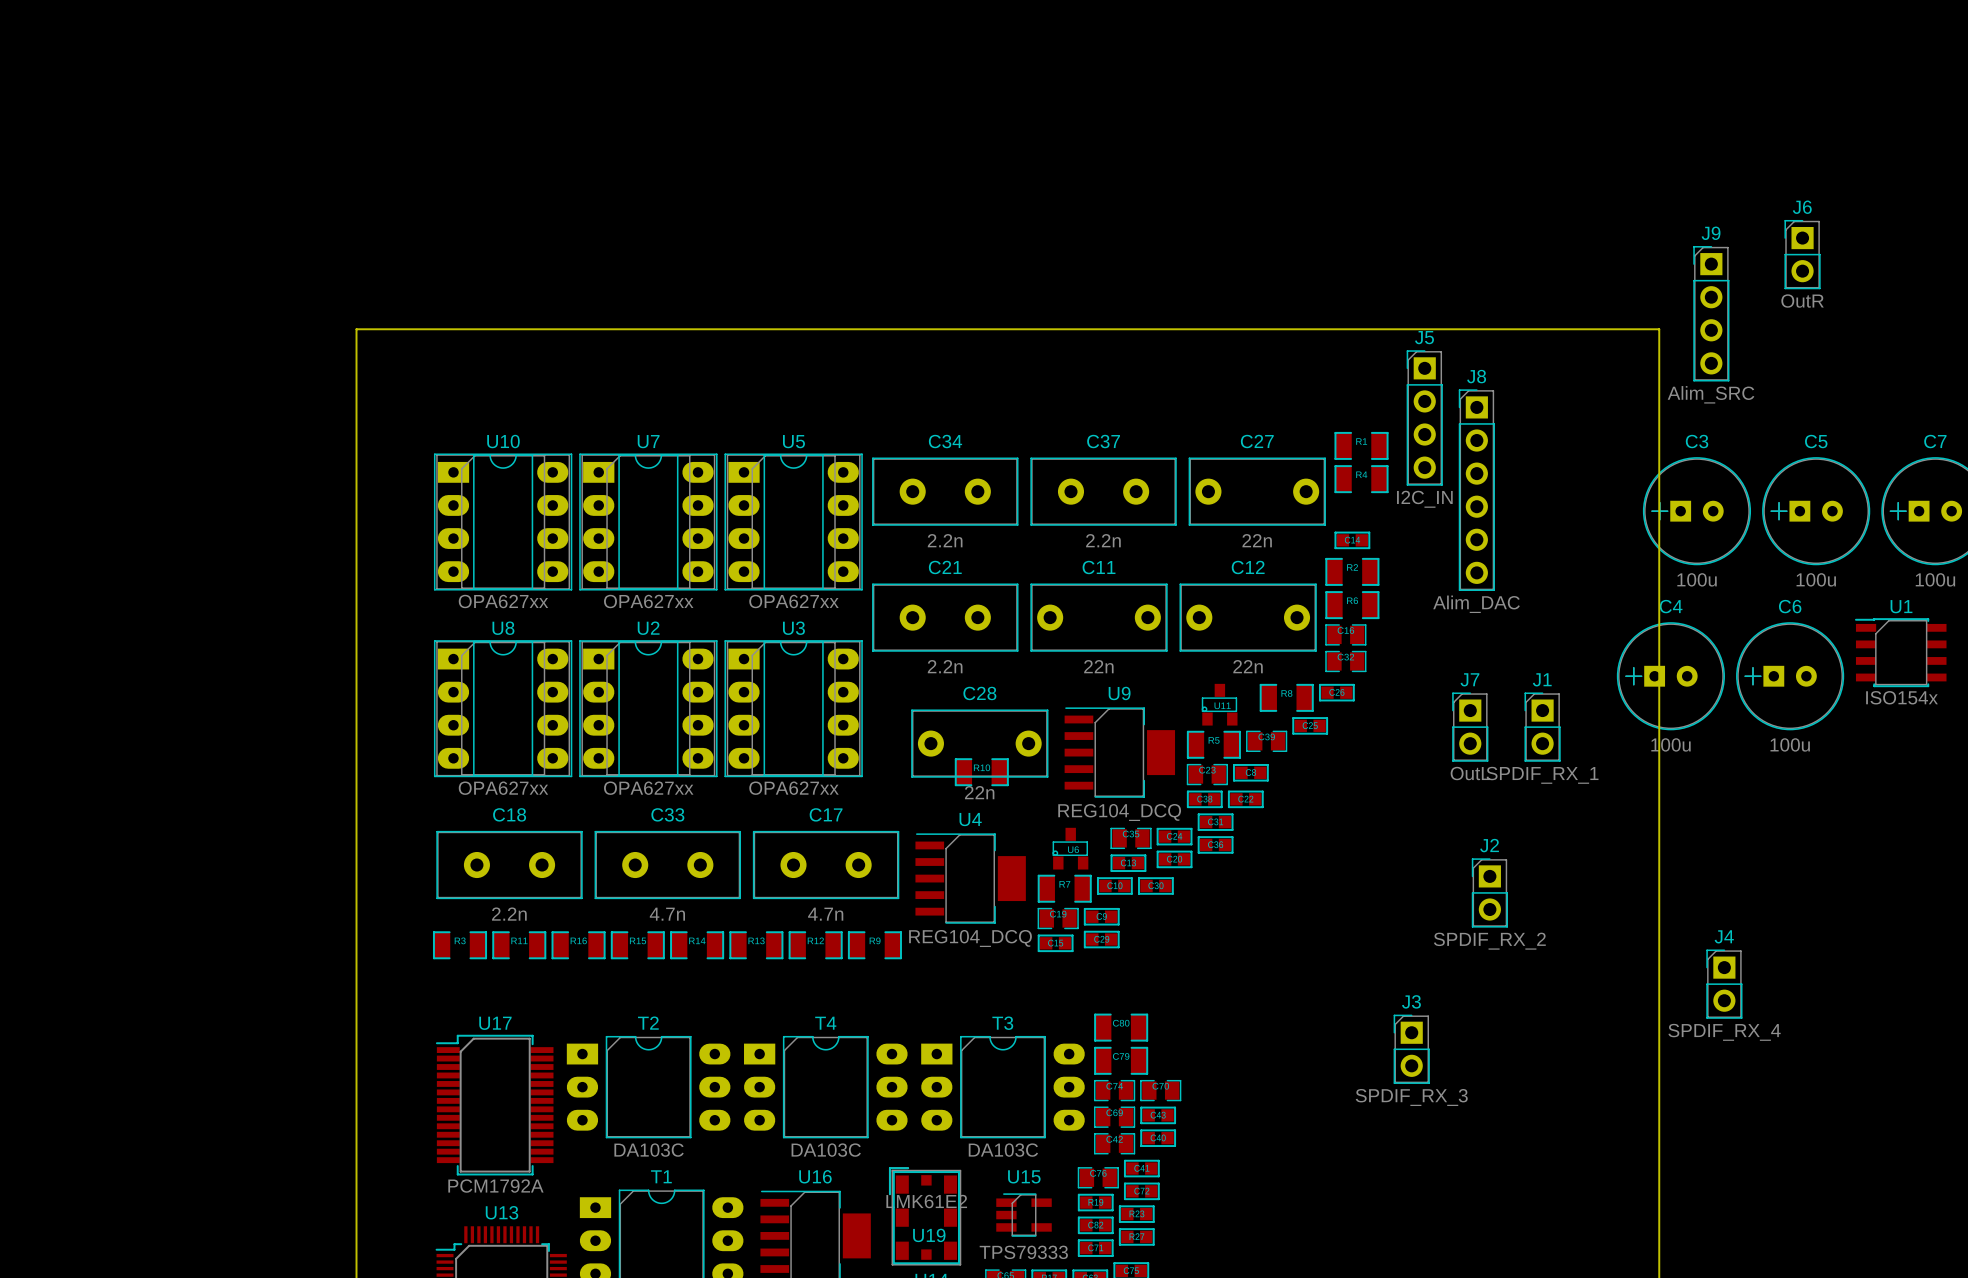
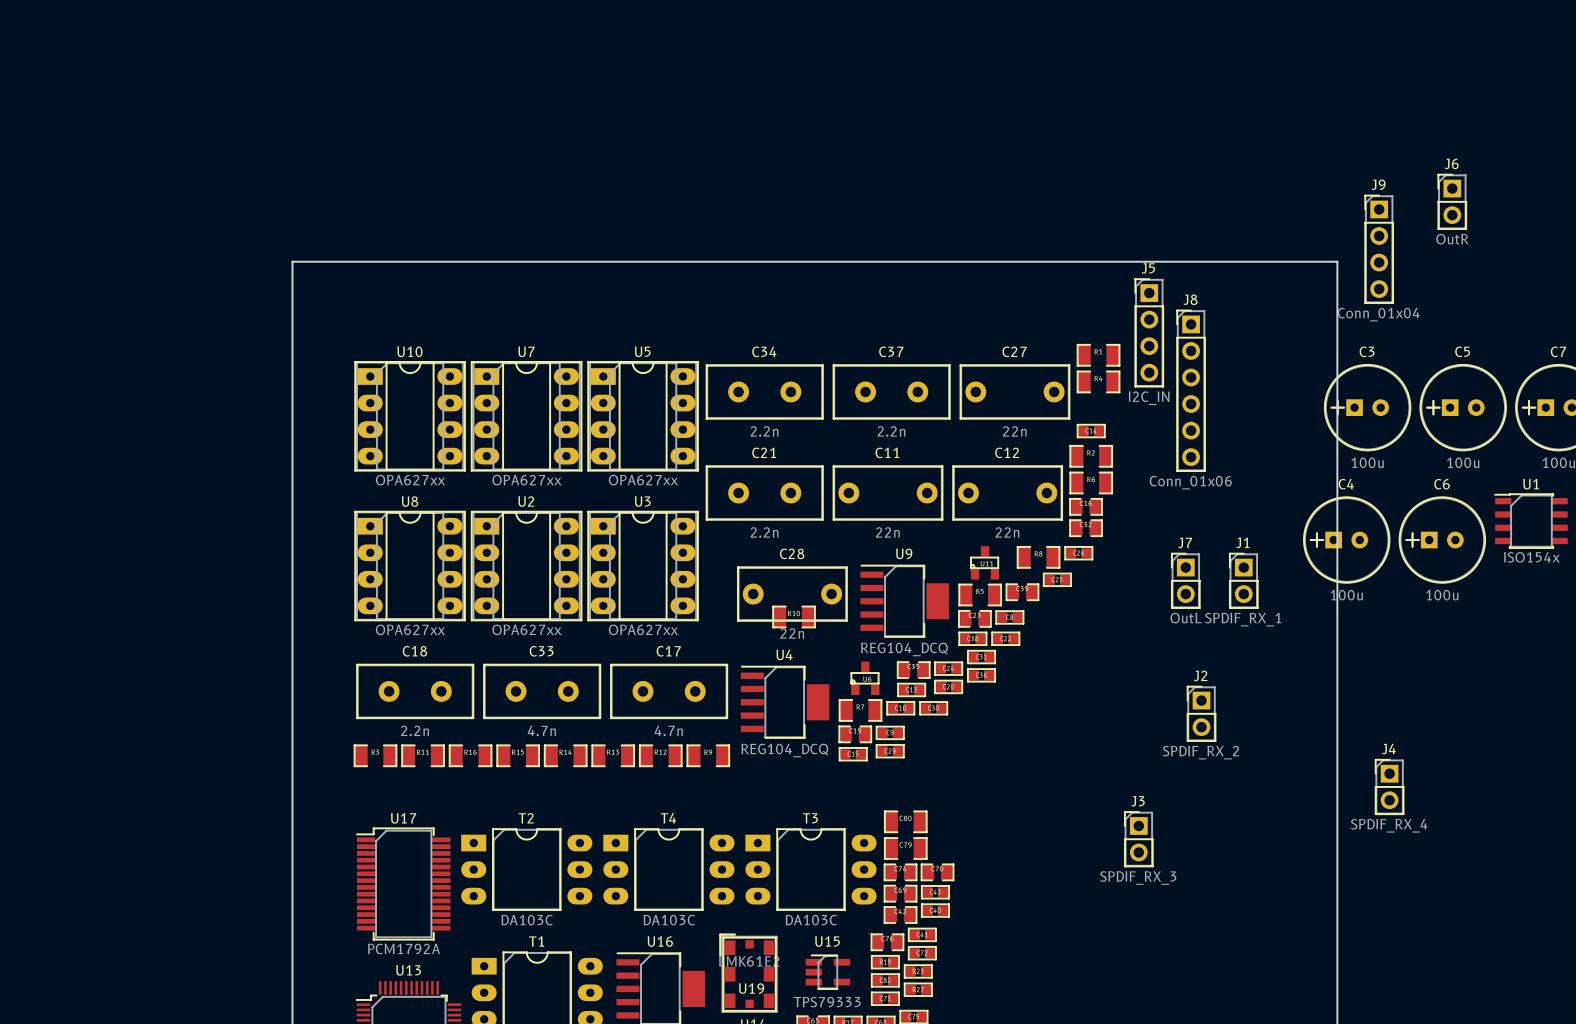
J9 value: Alim_SRC (1711, 394) -> Conn_01x04 (1378, 314)
J8 value: Alim_DAC (1476, 604) -> Conn_01x06 (1190, 482)

